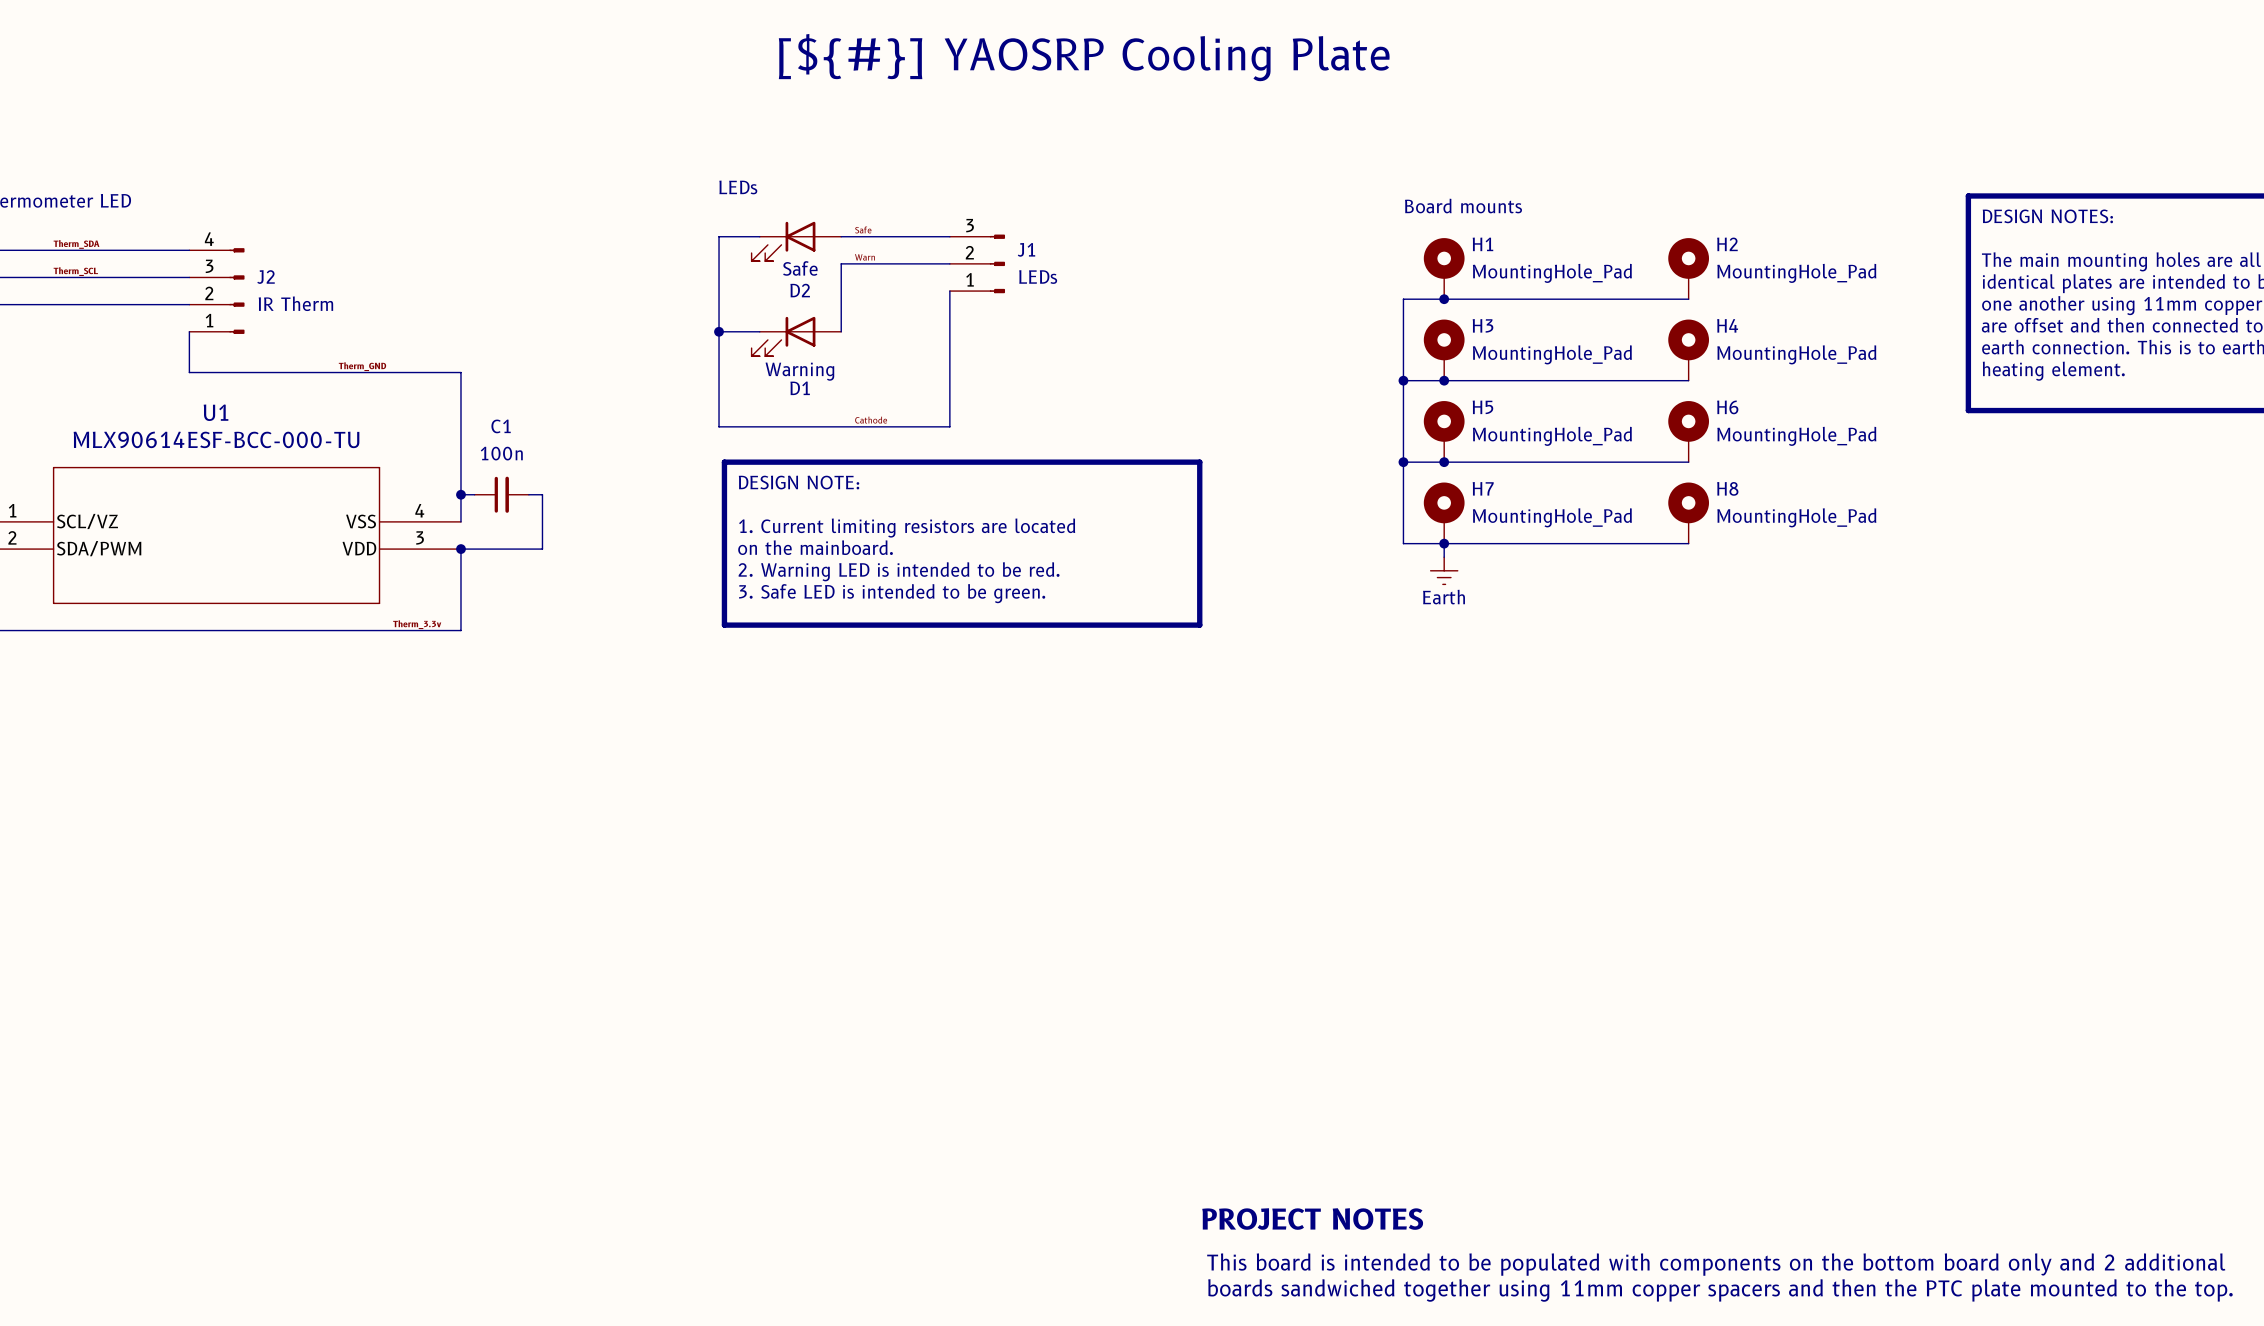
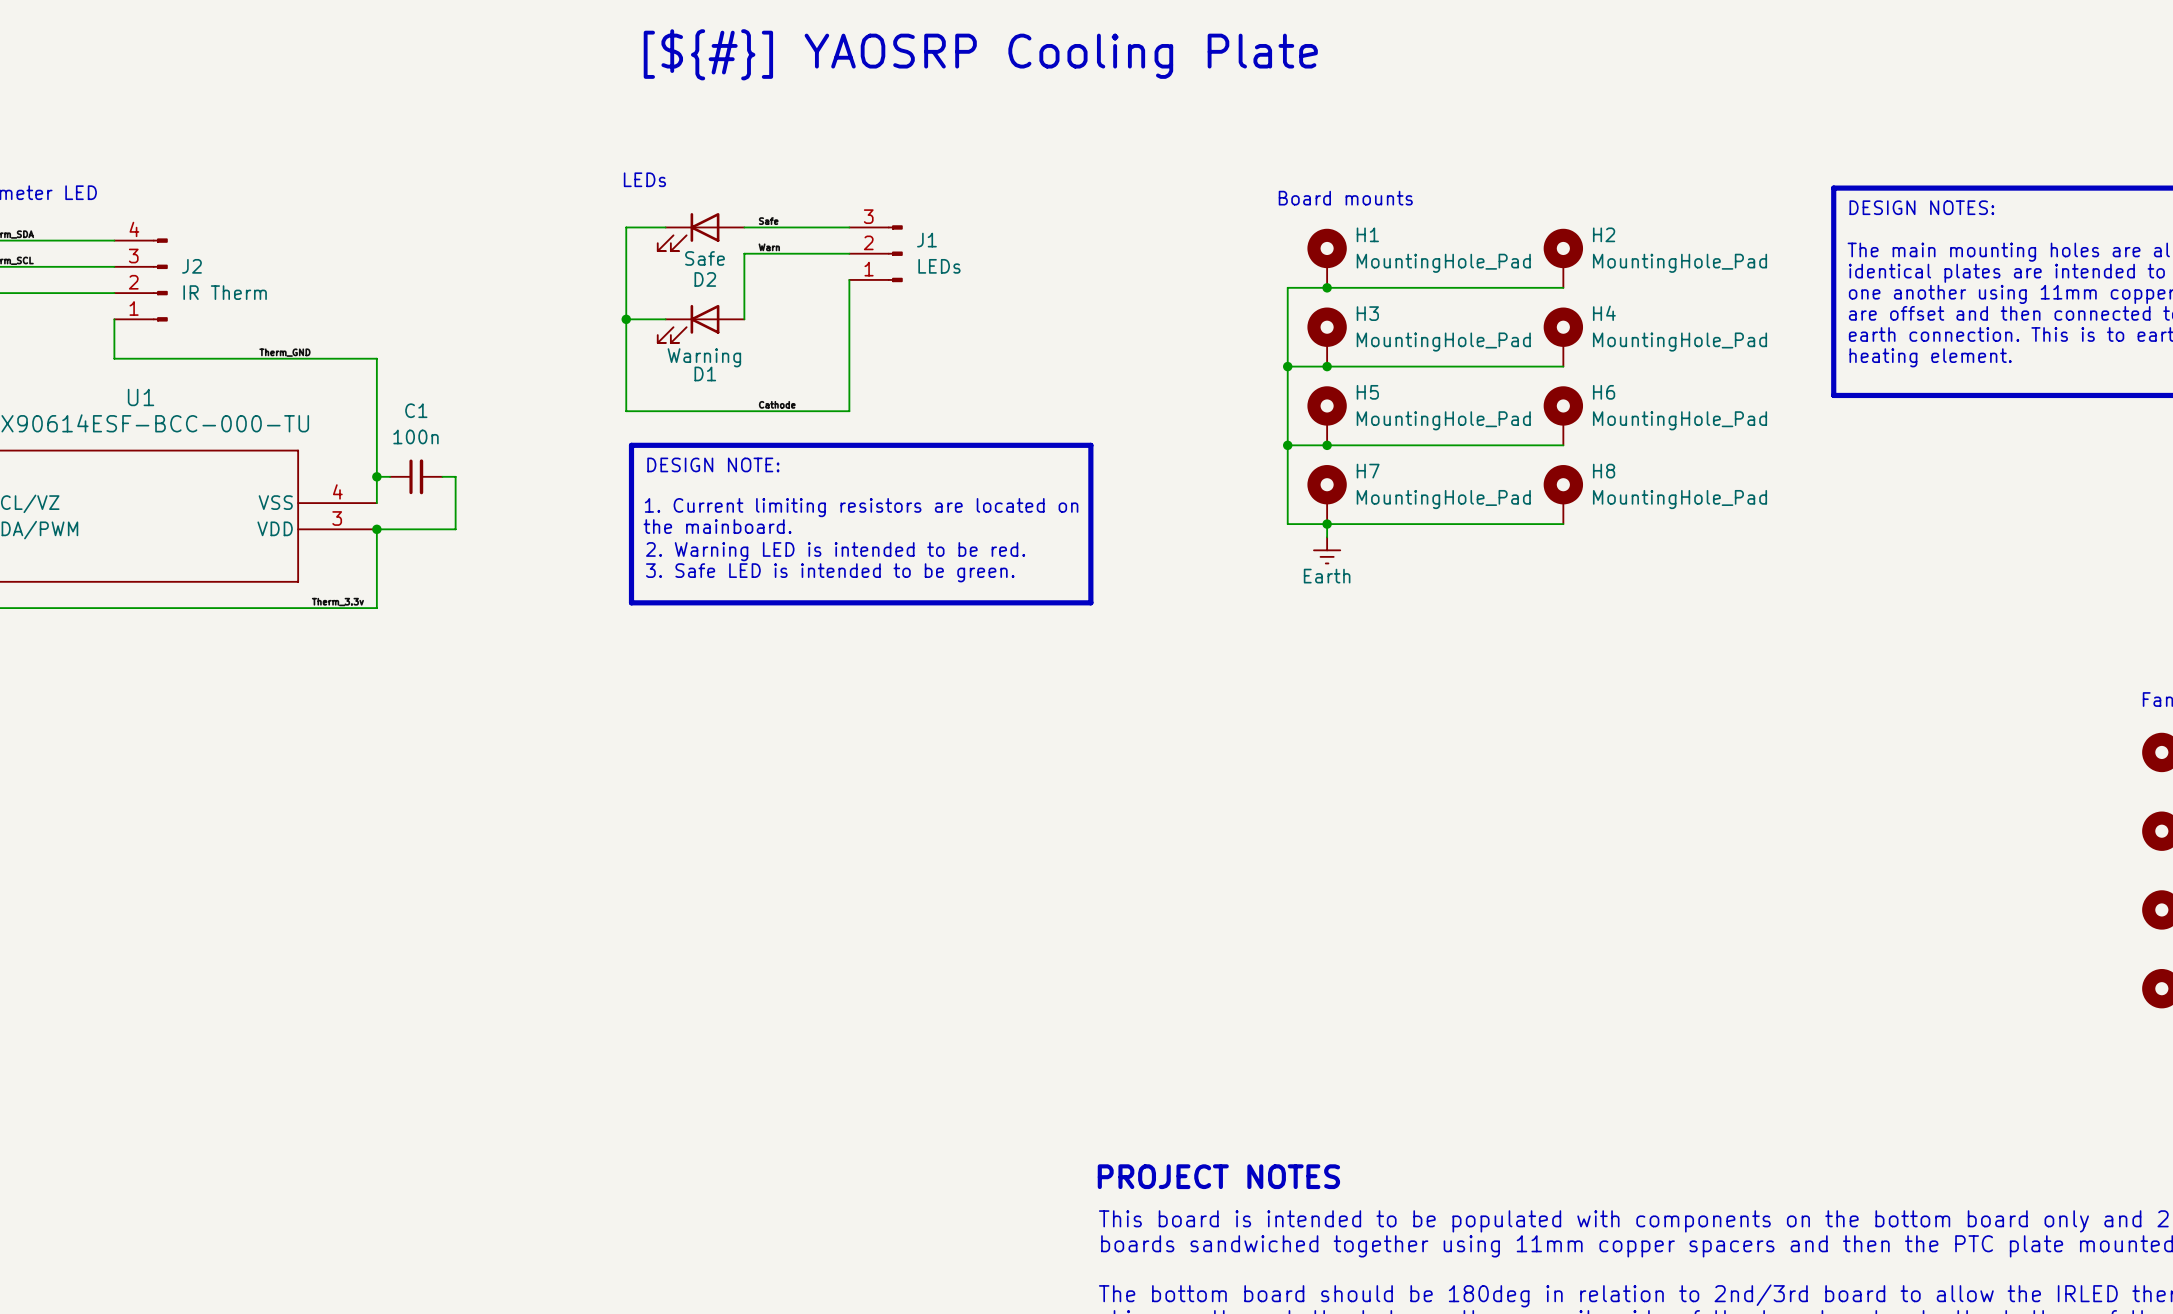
text: 1. Current limiting resistors are located (907, 528) -> 1. Current limiting resistors are located on (861, 507)
text: on the mainboard. (815, 547) -> the mainboard. (717, 526)

